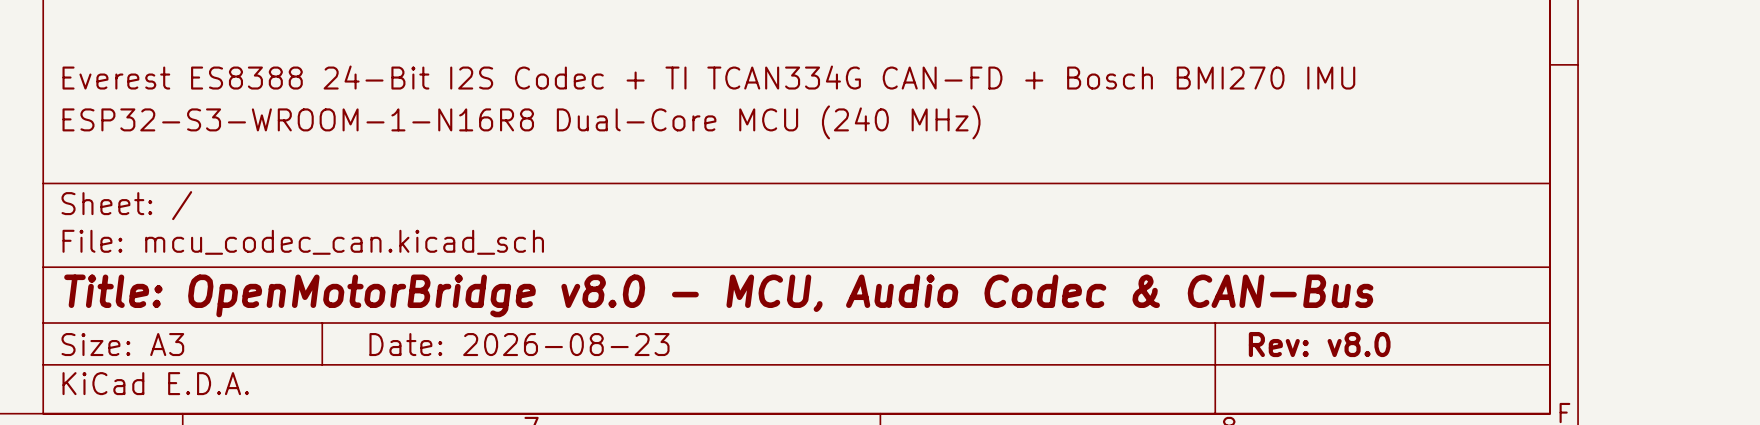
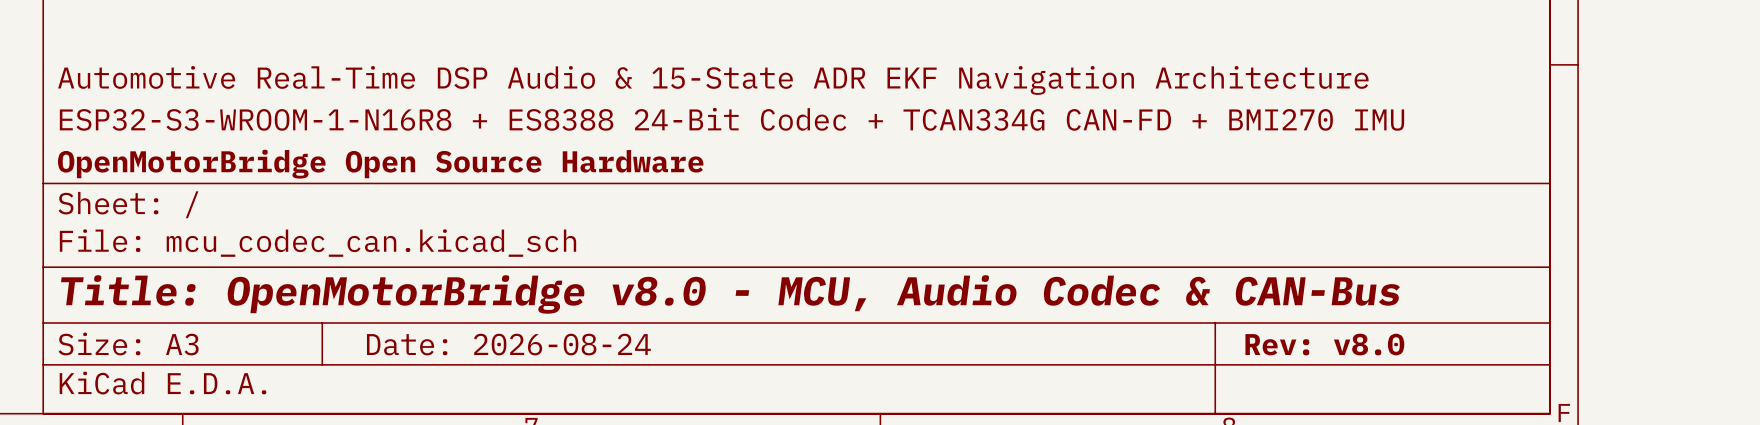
title block: Everest ES8388 24-Bit I2S Codec + TI TCAN334G CAN-FD + Bosch BMI270 IMU (708, 77) -> Automotive Real-Time DSP Audio & 15-State ADR EKF Navigation Architecture (713, 80)
title block: ESP32-S3-WROOM-1-N16R8 Dual-Core MCU (240 MHz) (521, 122) -> ESP32-S3-WROOM-1-N16R8 + ES8388 24-Bit Codec + TCAN334G CAN-FD + BMI270 IMU (732, 119)
title block: none -> OpenMotorBridge Open Source Hardware (380, 164)
title block: Date: 2026-08-23 (519, 344) -> Date: 2026-08-24 (508, 344)

